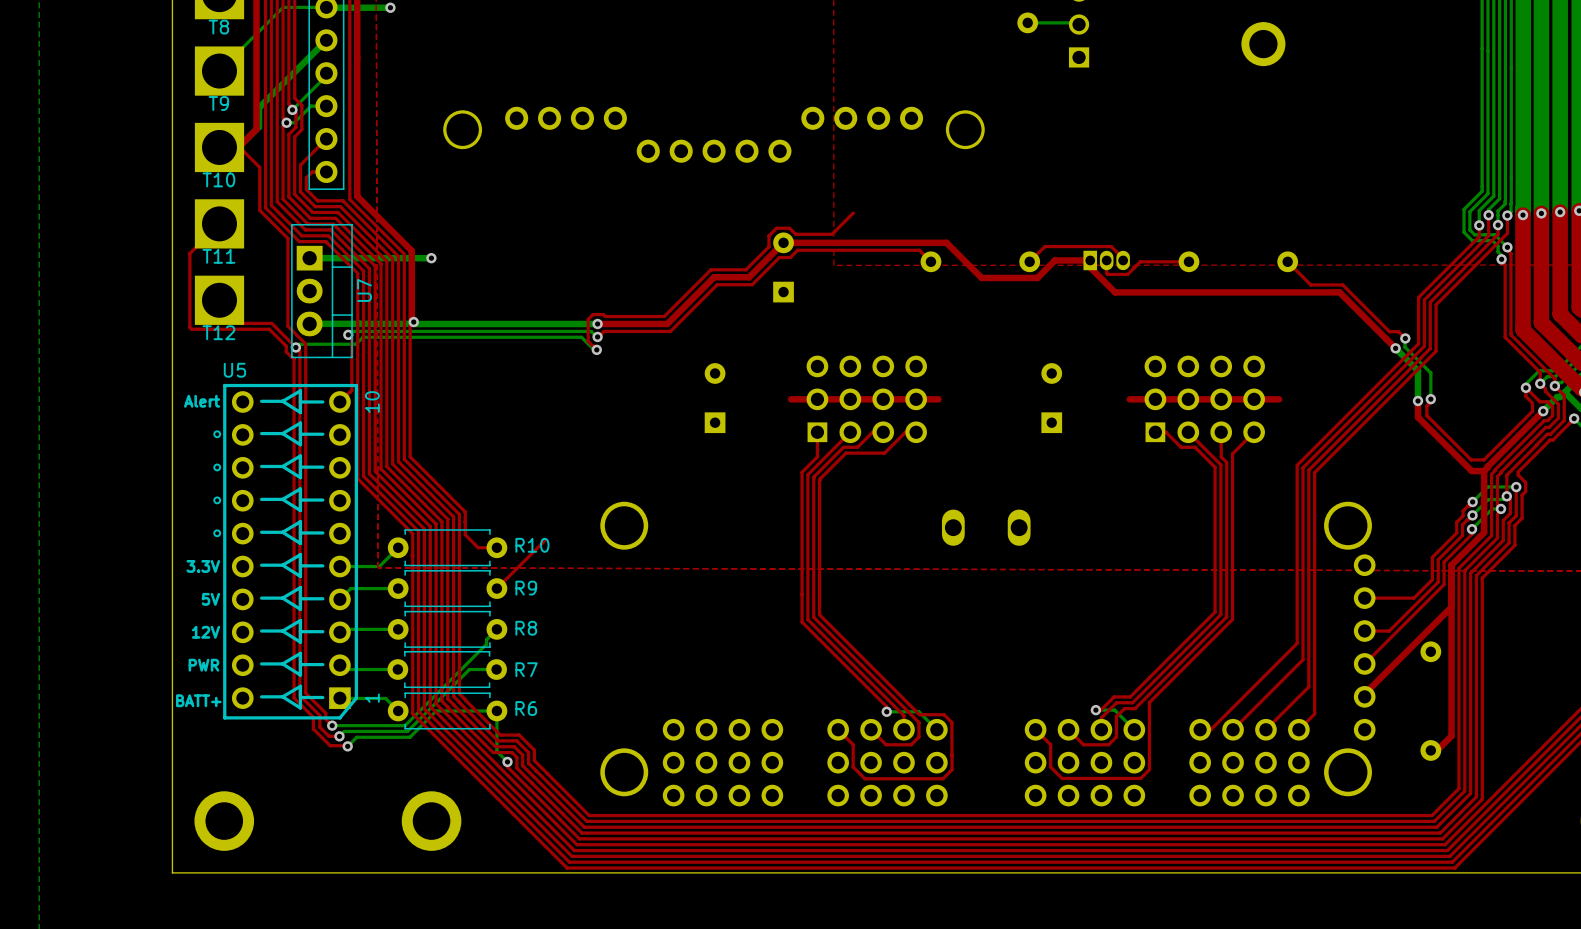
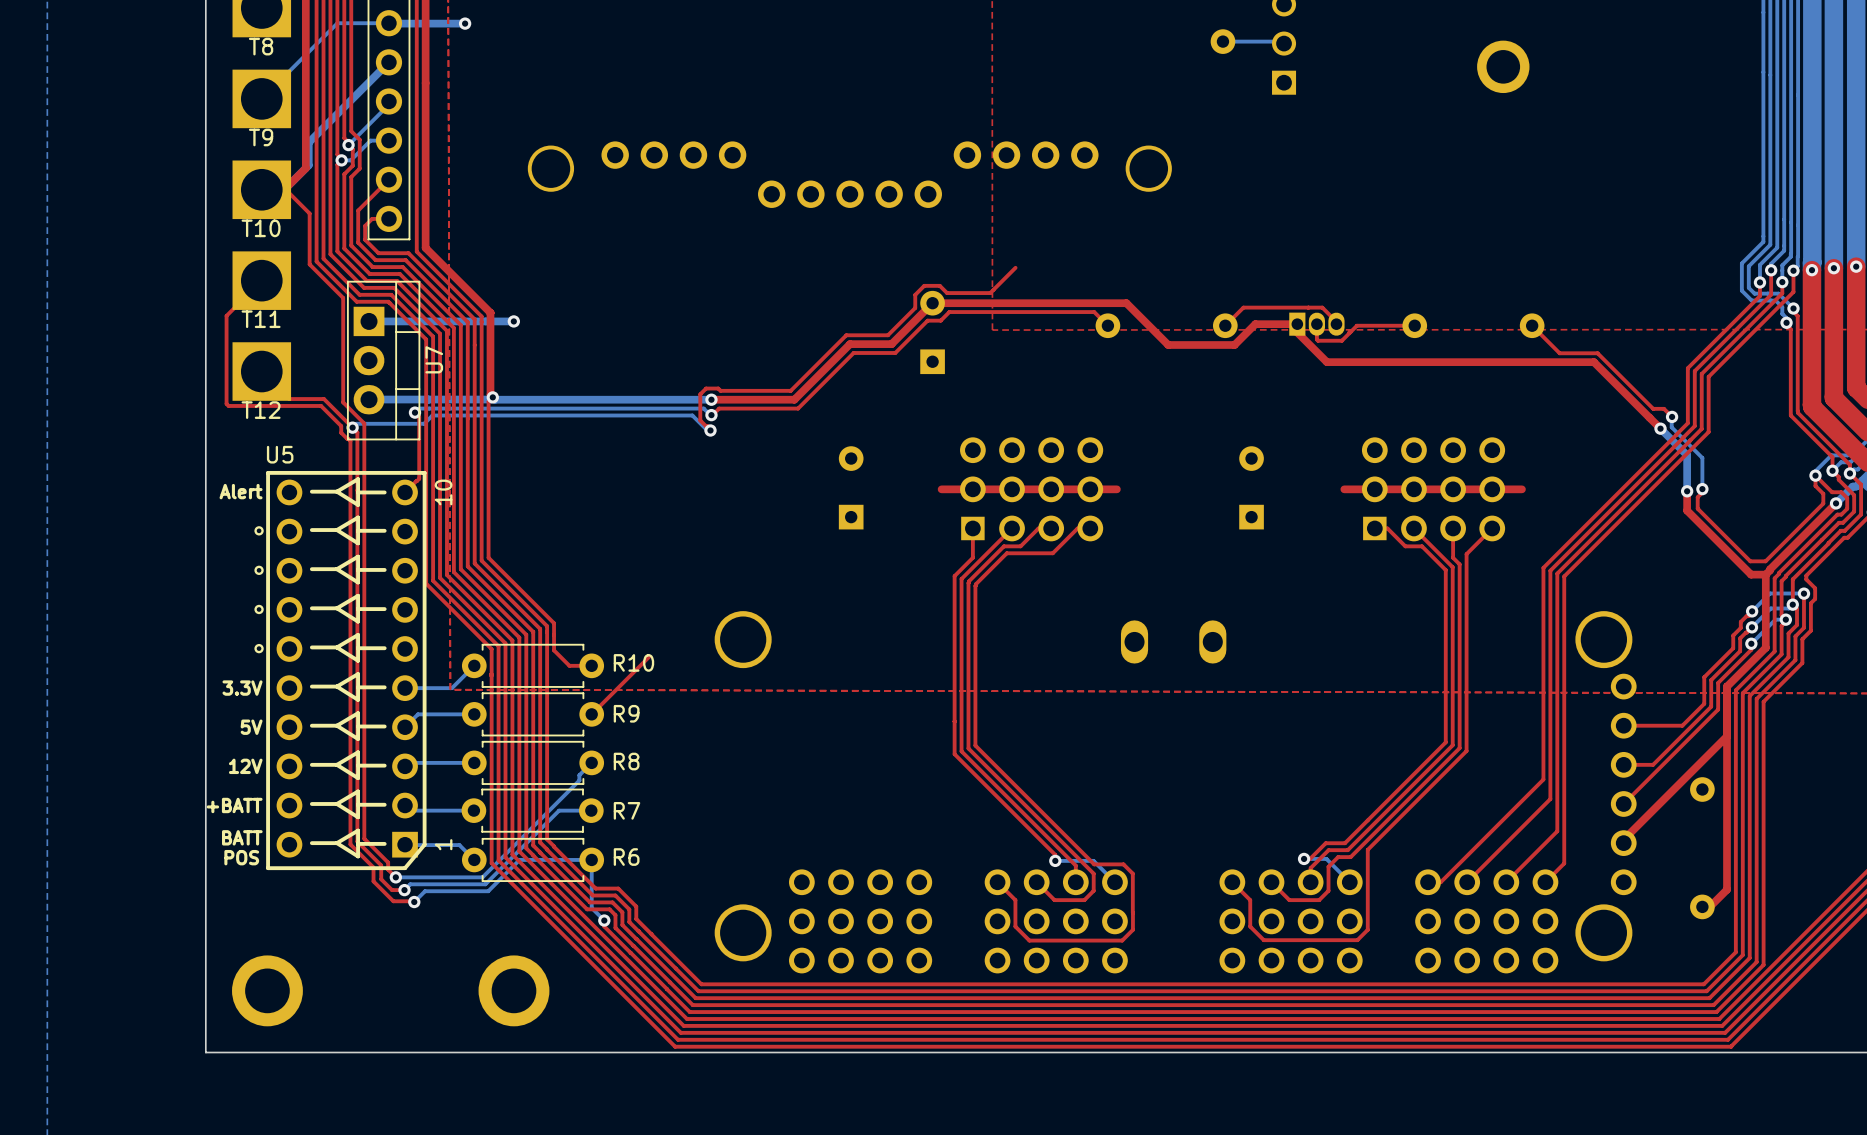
text: PWR (203, 665) -> +BATT (234, 805)
text: BATT+ (198, 700) -> BATT (242, 837)
text: none -> POS (241, 857)

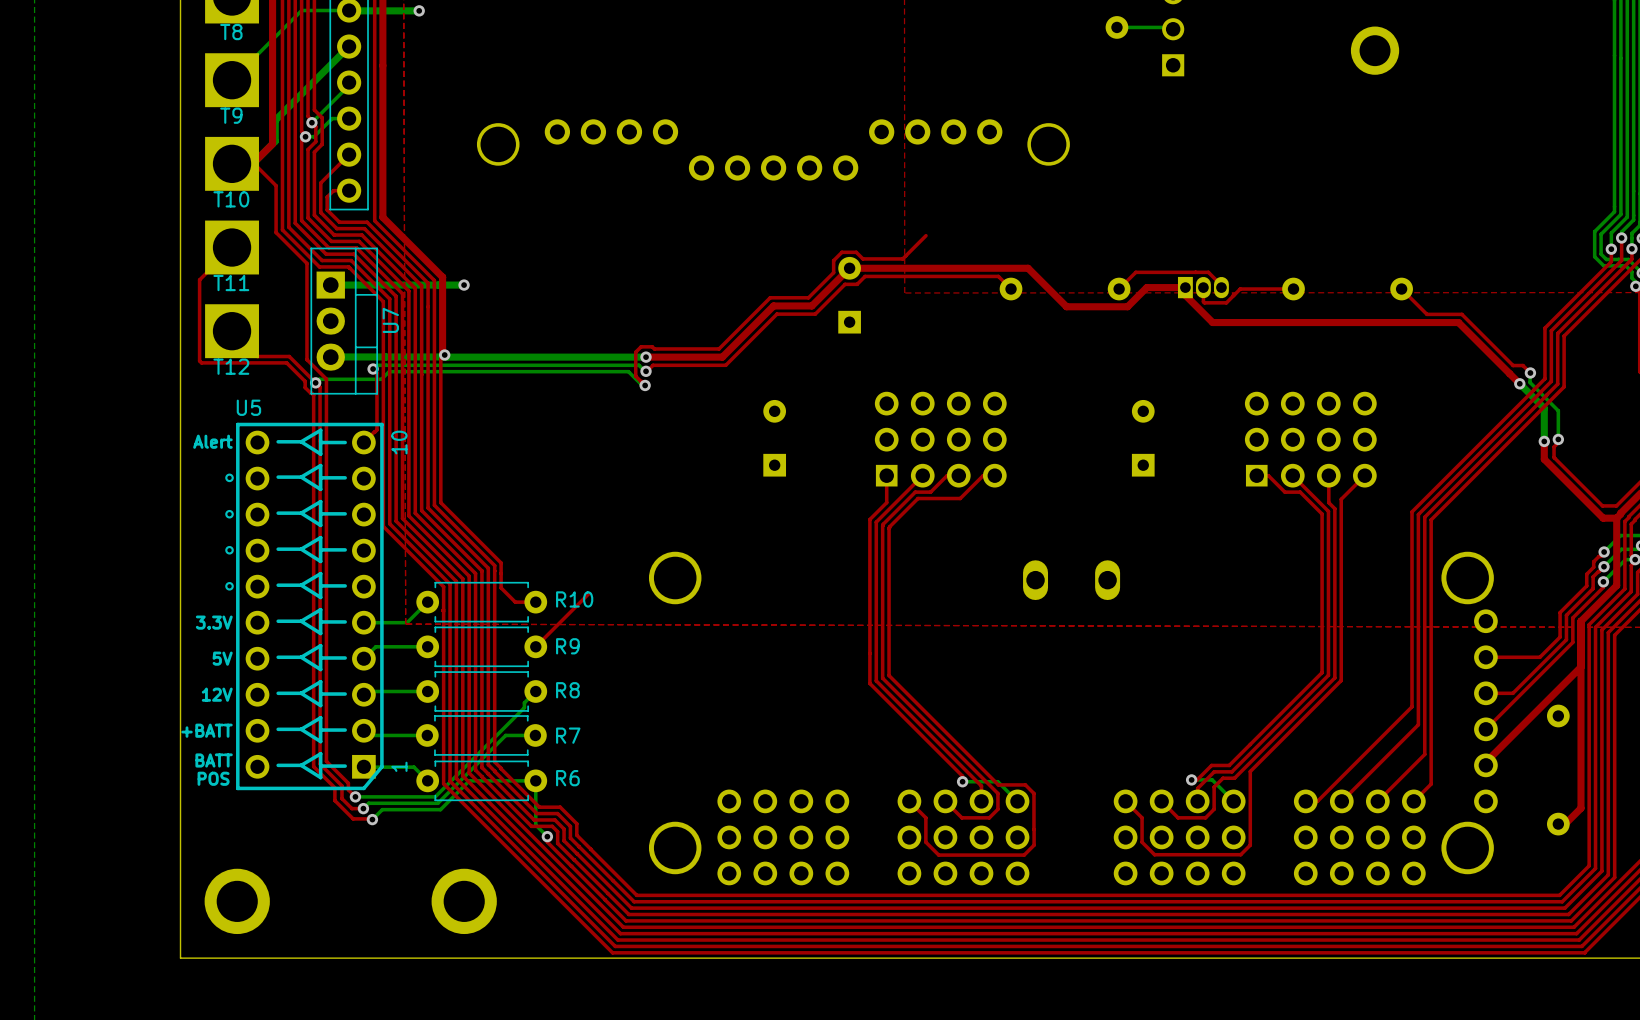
top track: (941, 489) (1116, 489) -> none
top track: (1344, 489) (1521, 489) -> none

